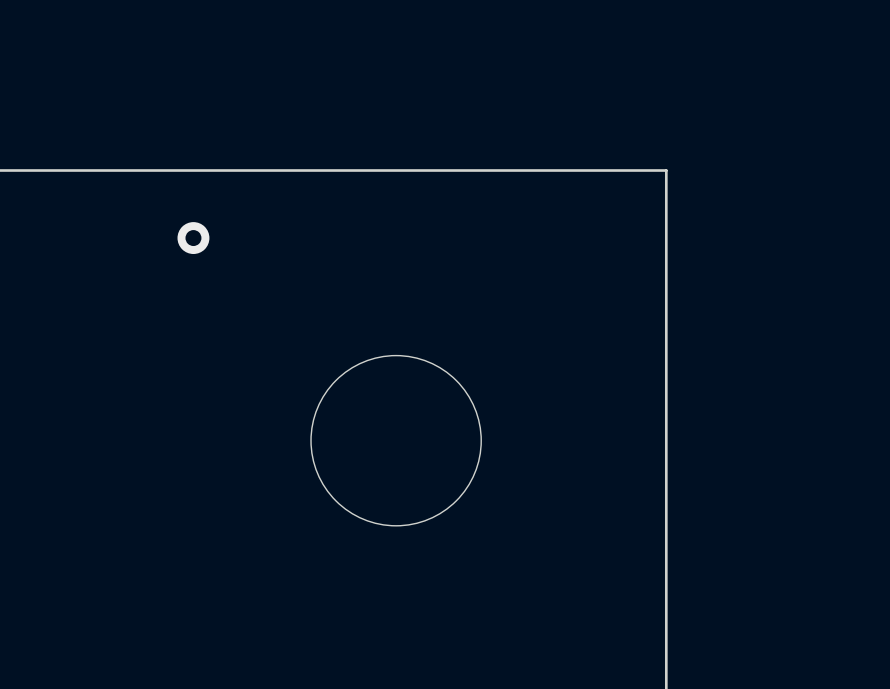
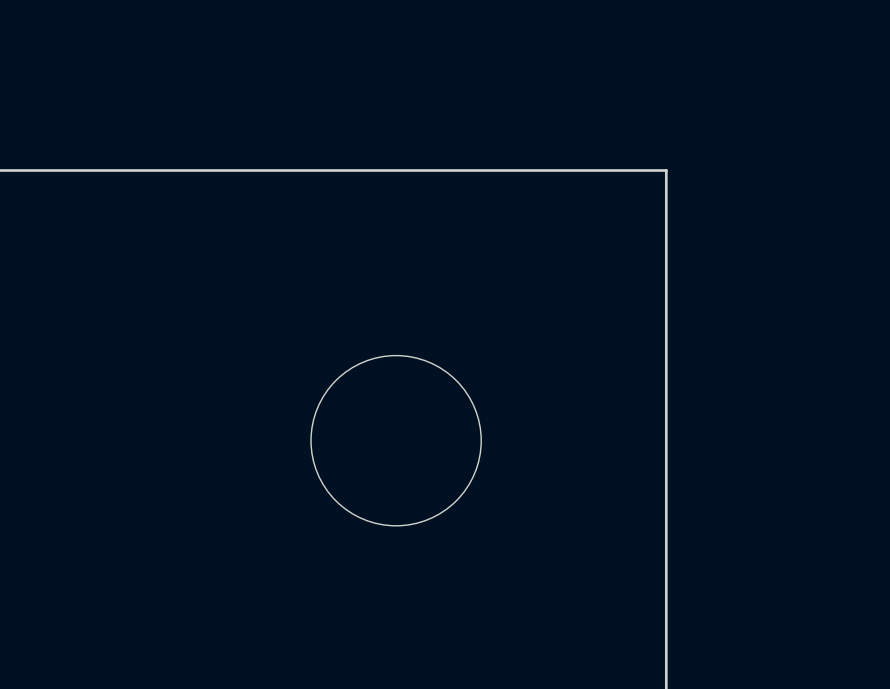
via: (193, 238) -> none

